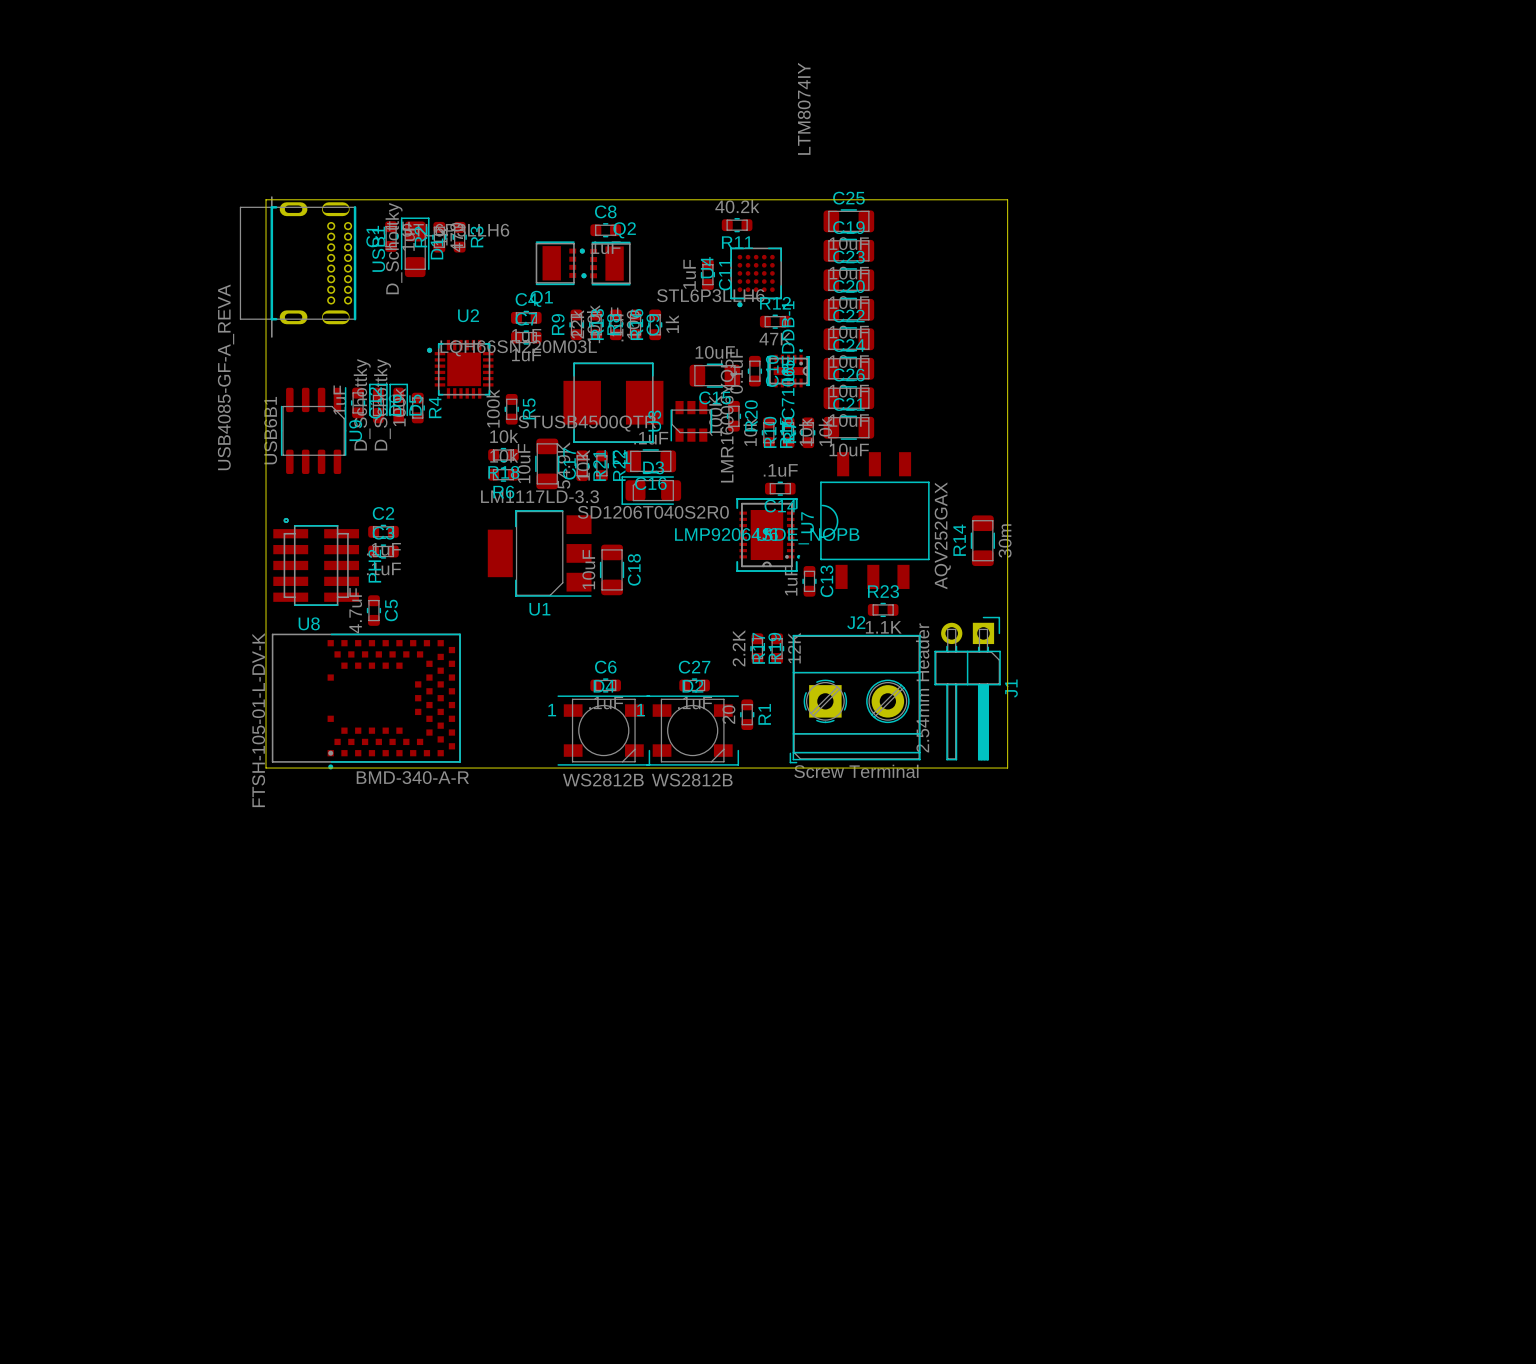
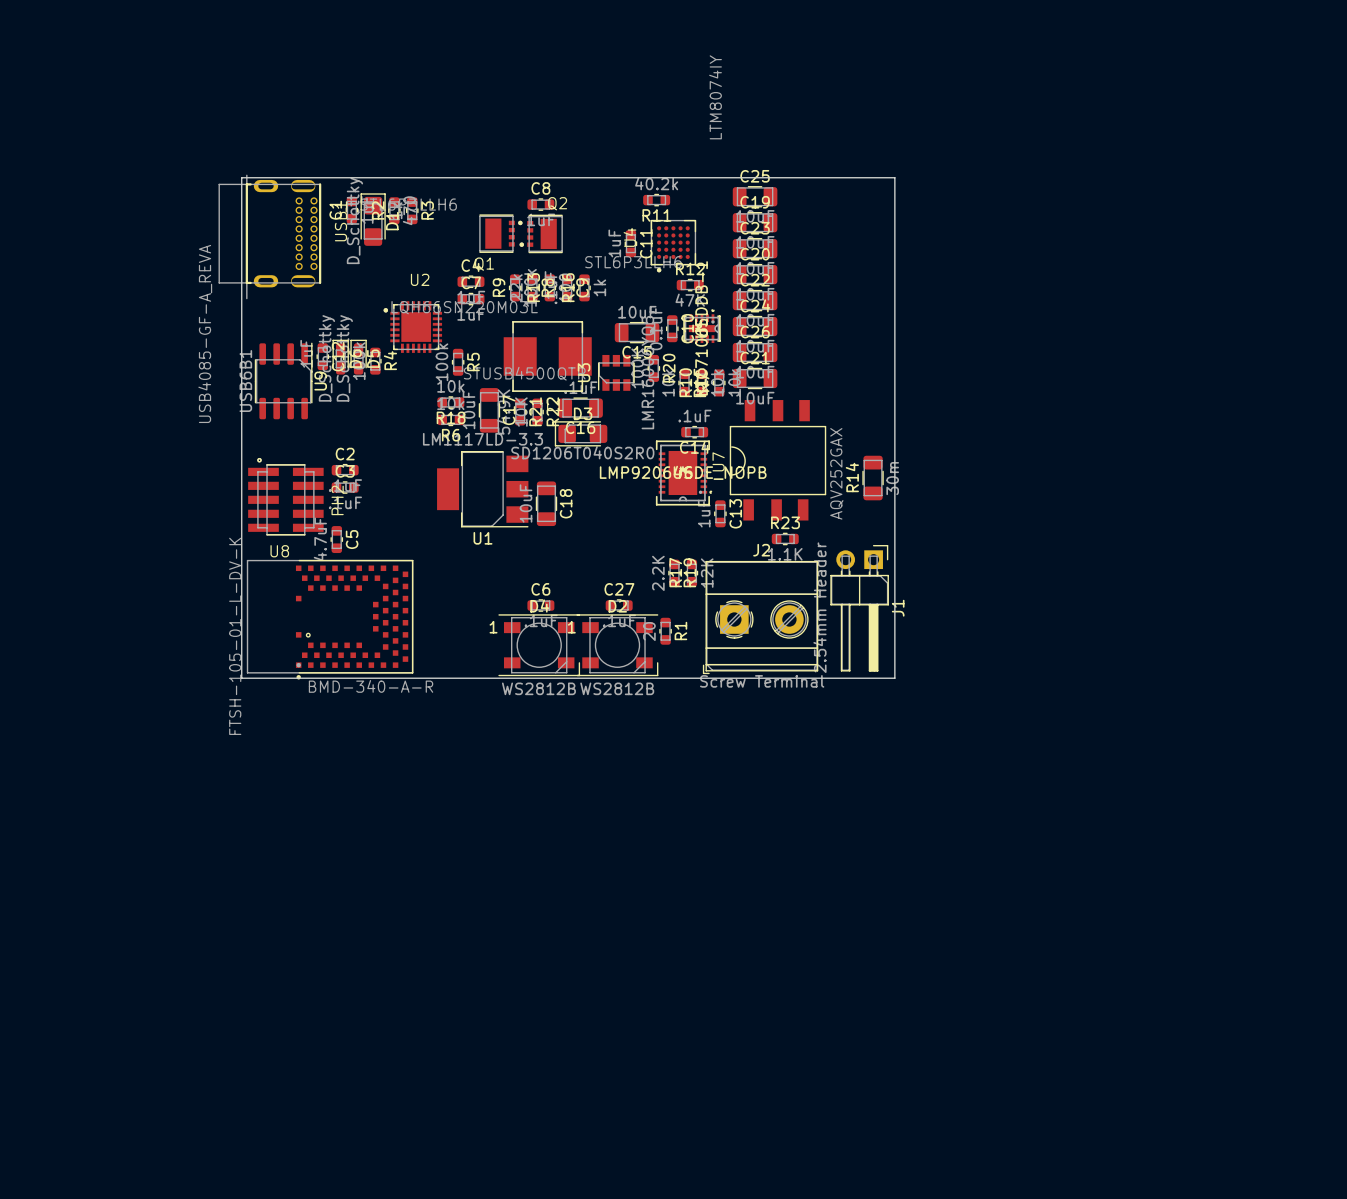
drawing: none -> [306, 633, 311, 638]

